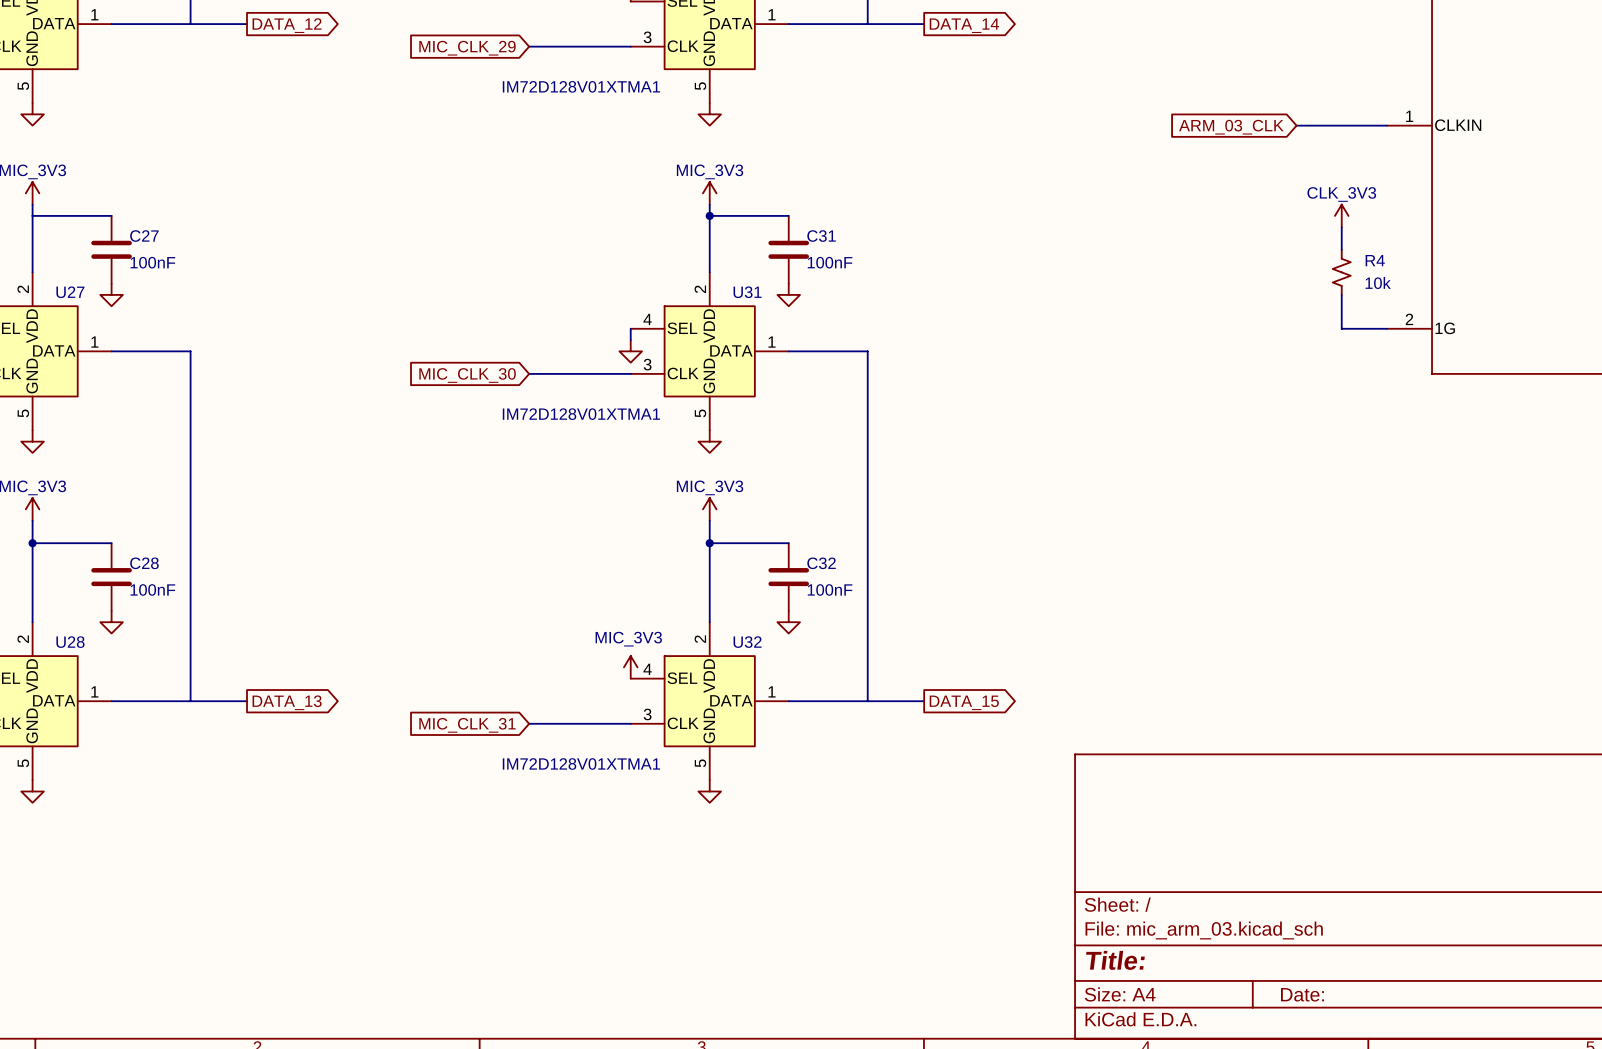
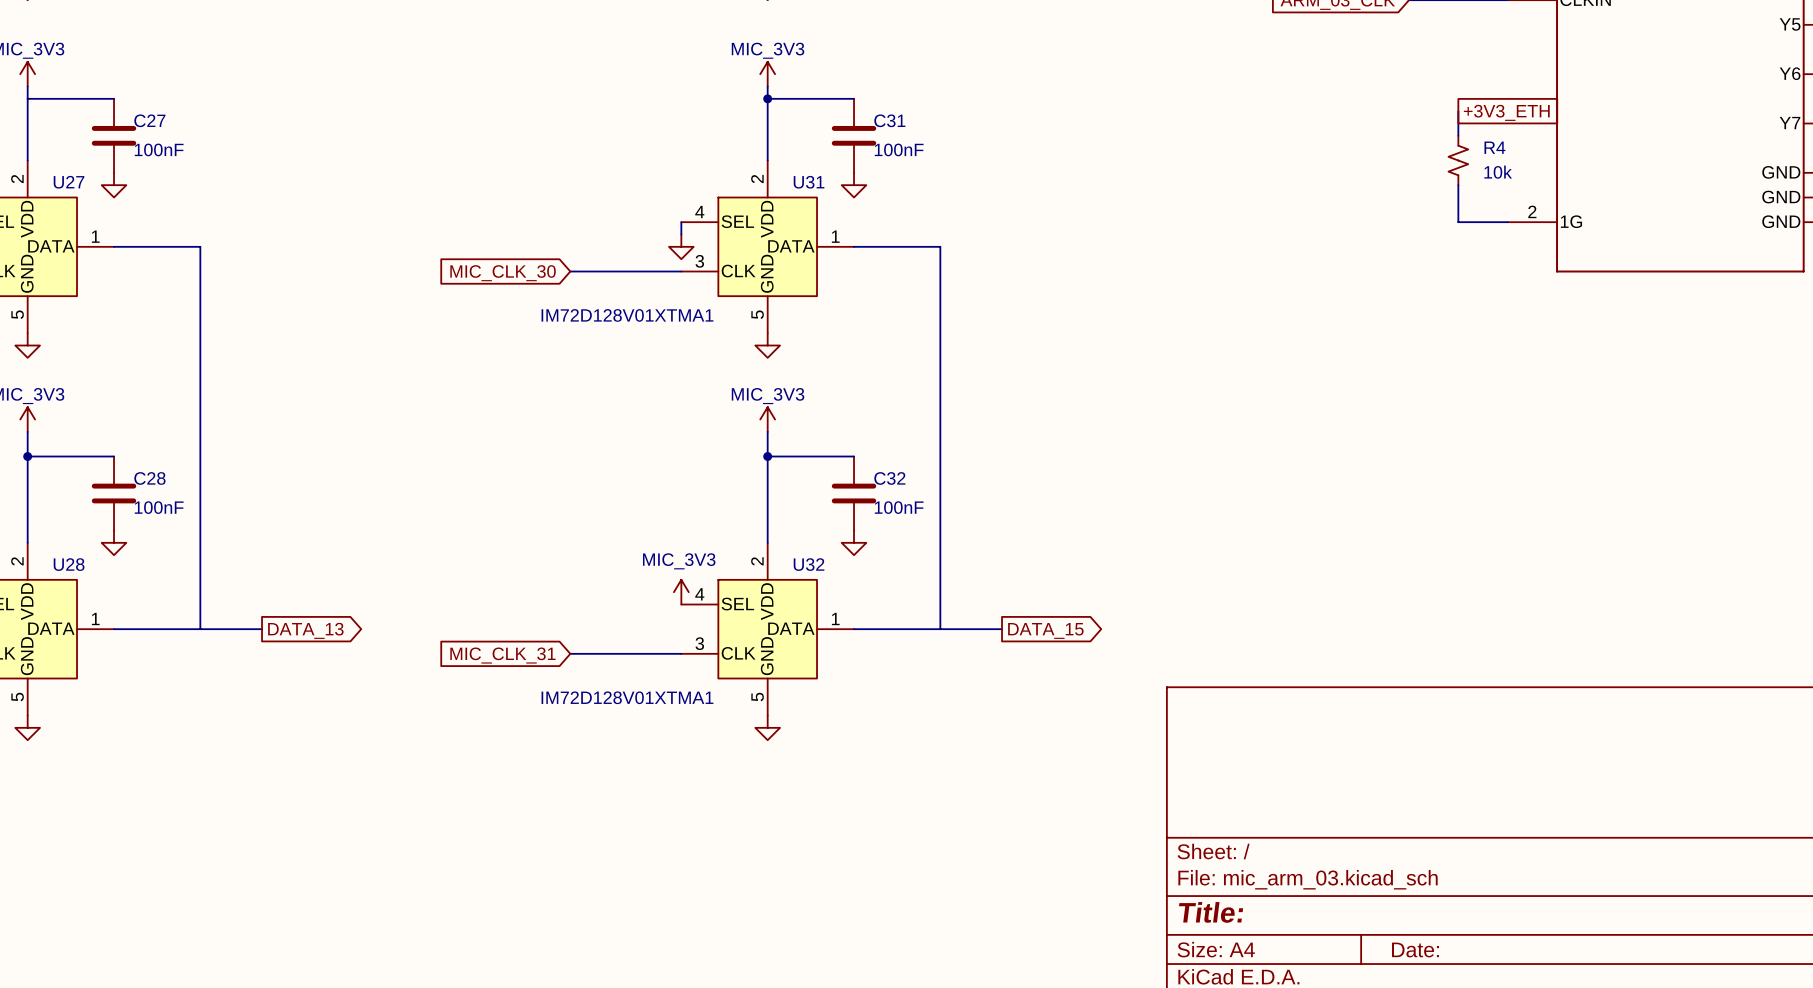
power symbol: CLK_3V3 (1341, 215) -> none
global label: none -> +3V3_ETH (1506, 112)

